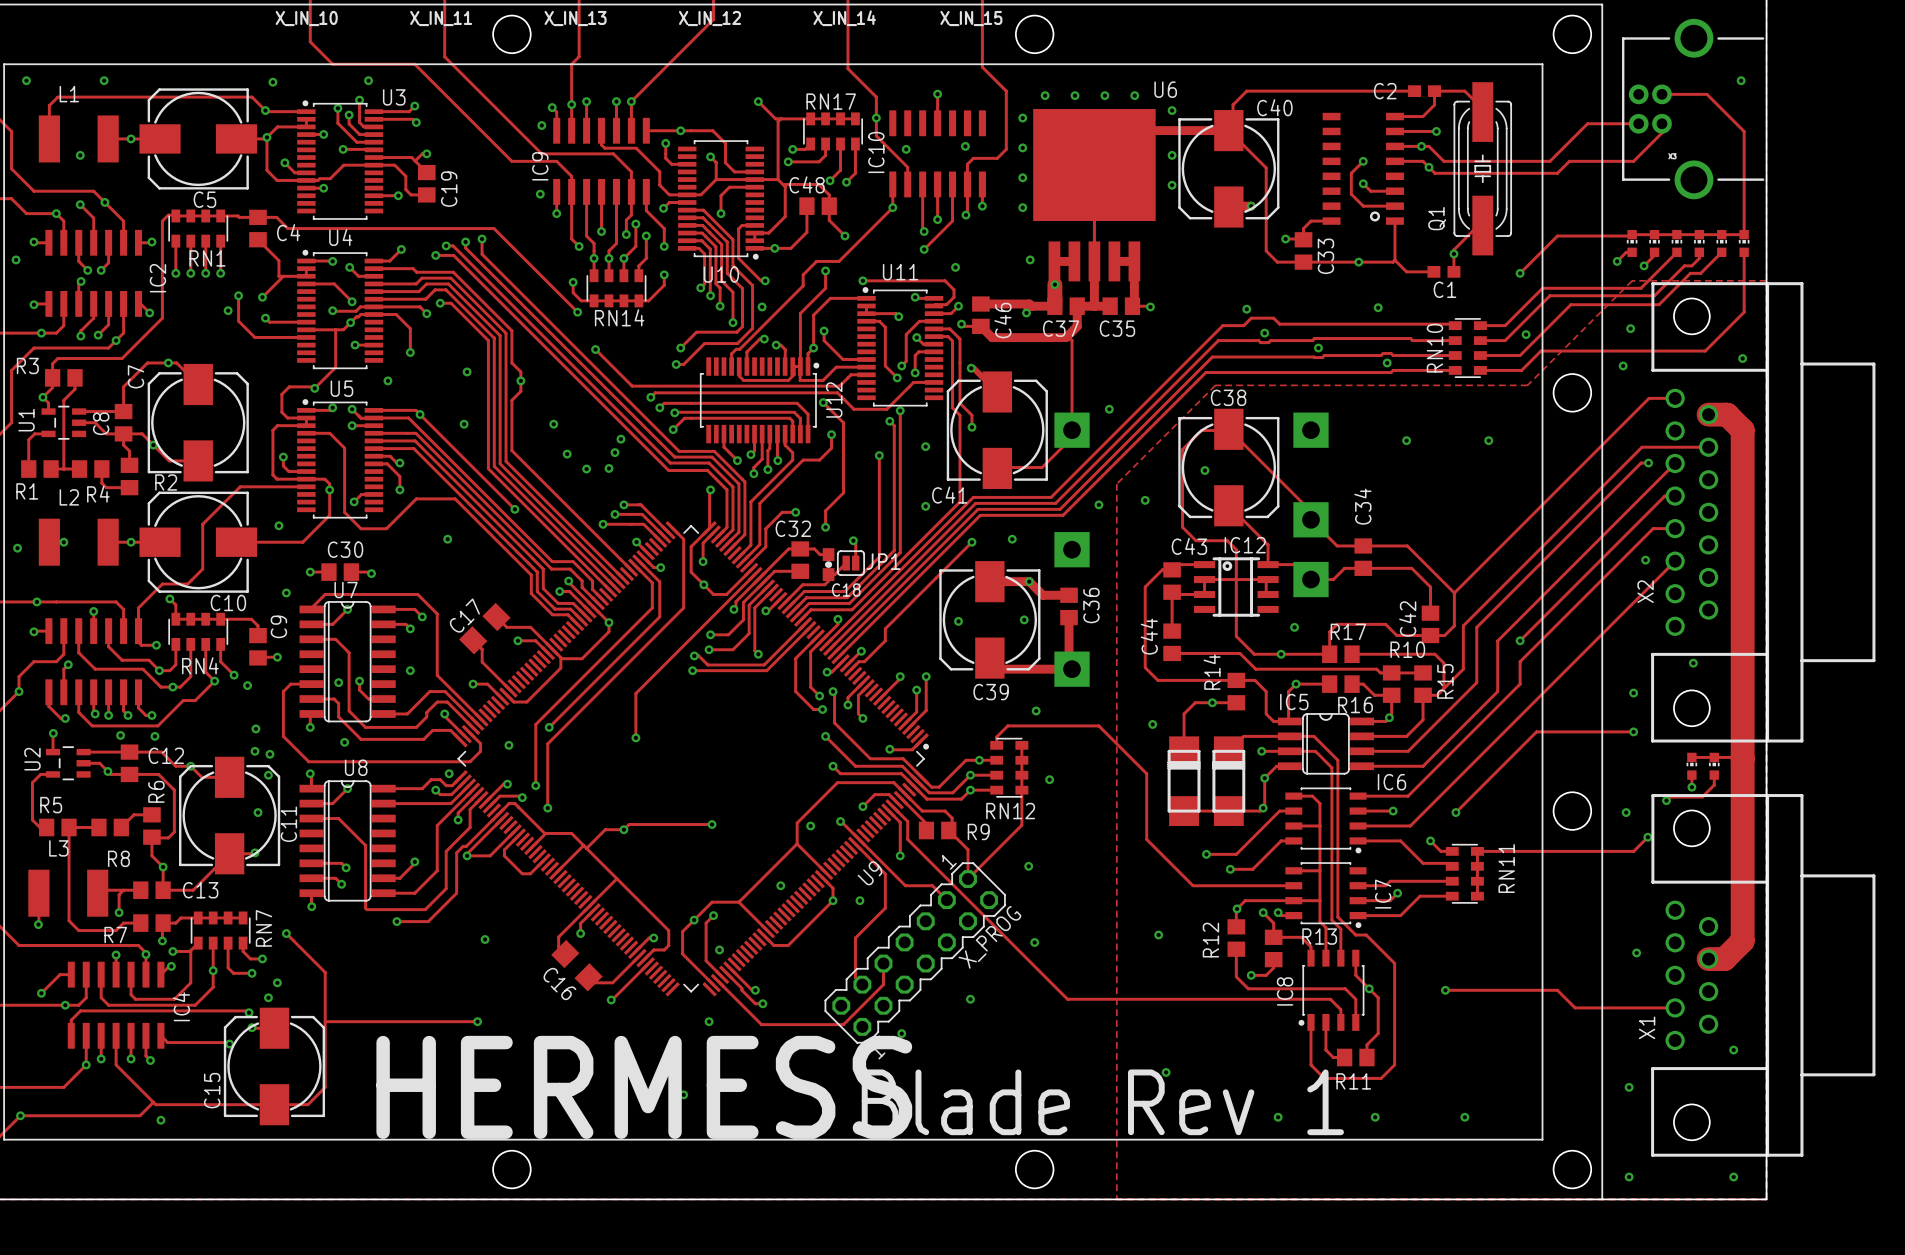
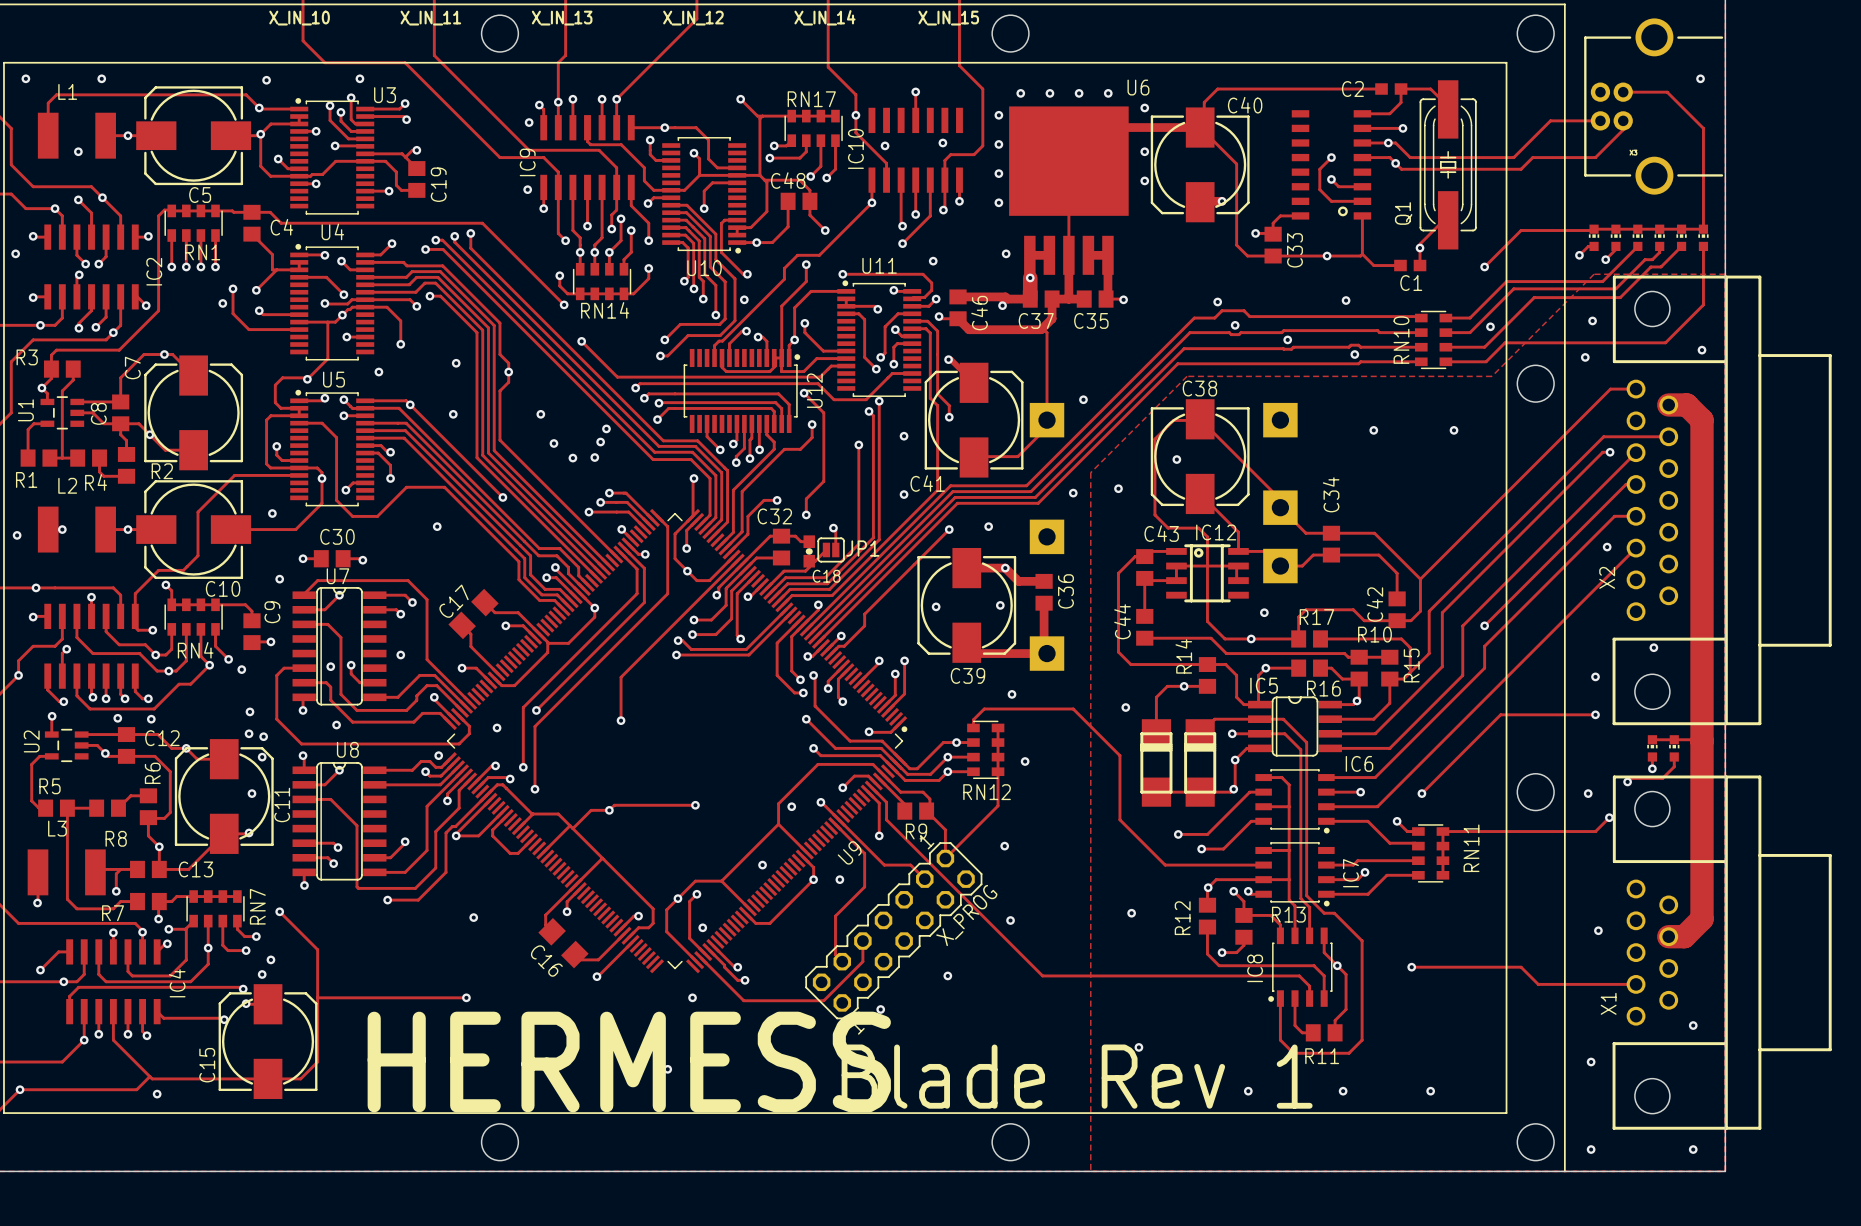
R9 name position: R9 (978, 831) -> R9 (916, 831)

